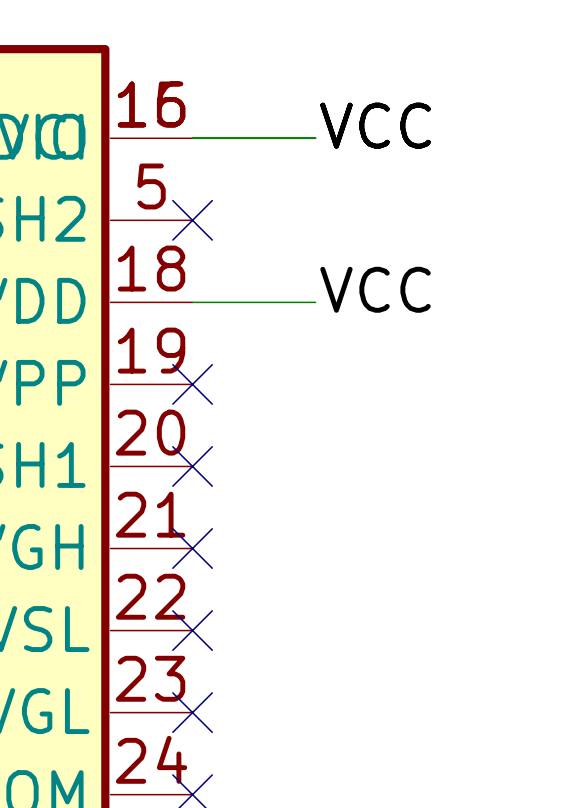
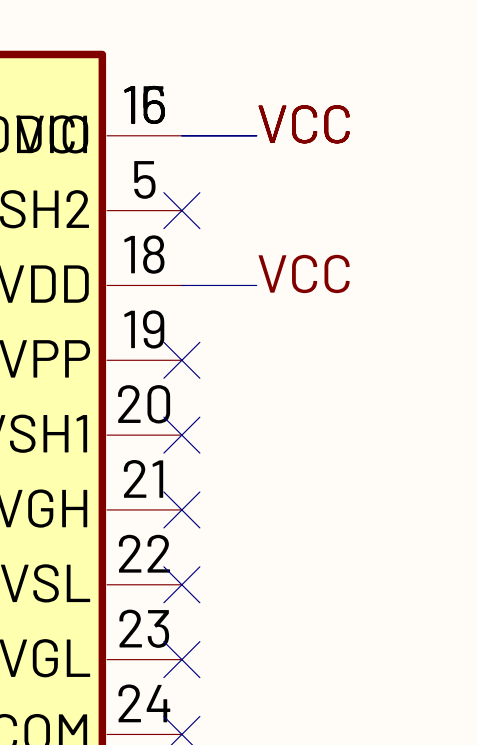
label position: VCC (375, 125) -> VCC (304, 124)
wire: (274, 138) (315, 138) -> none
label position: VCC (375, 289) -> VCC (304, 273)
wire: (274, 302) (315, 302) -> none

